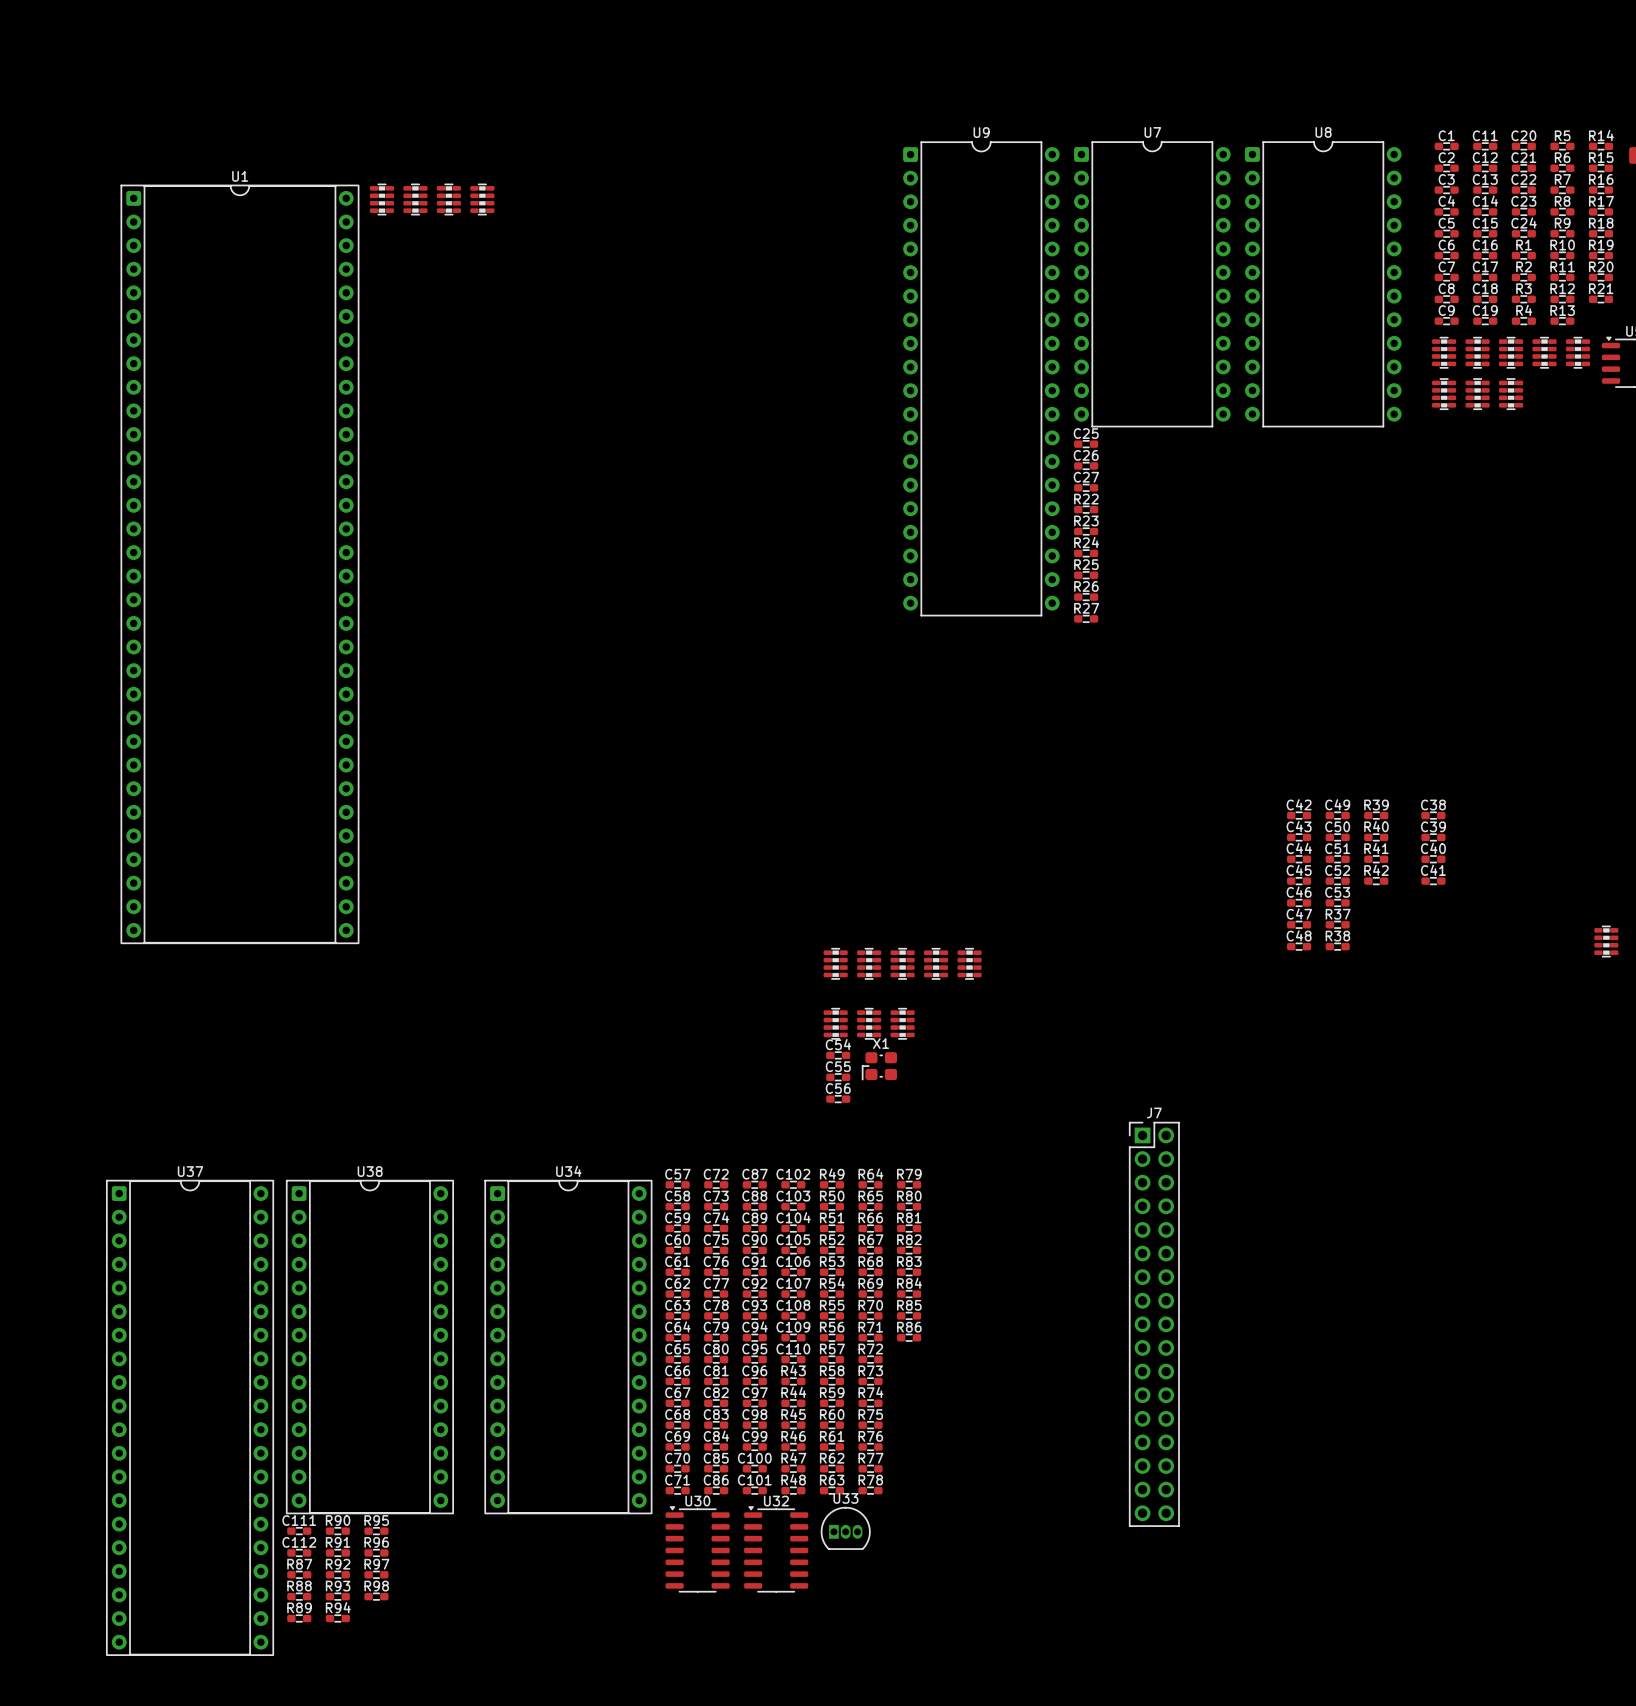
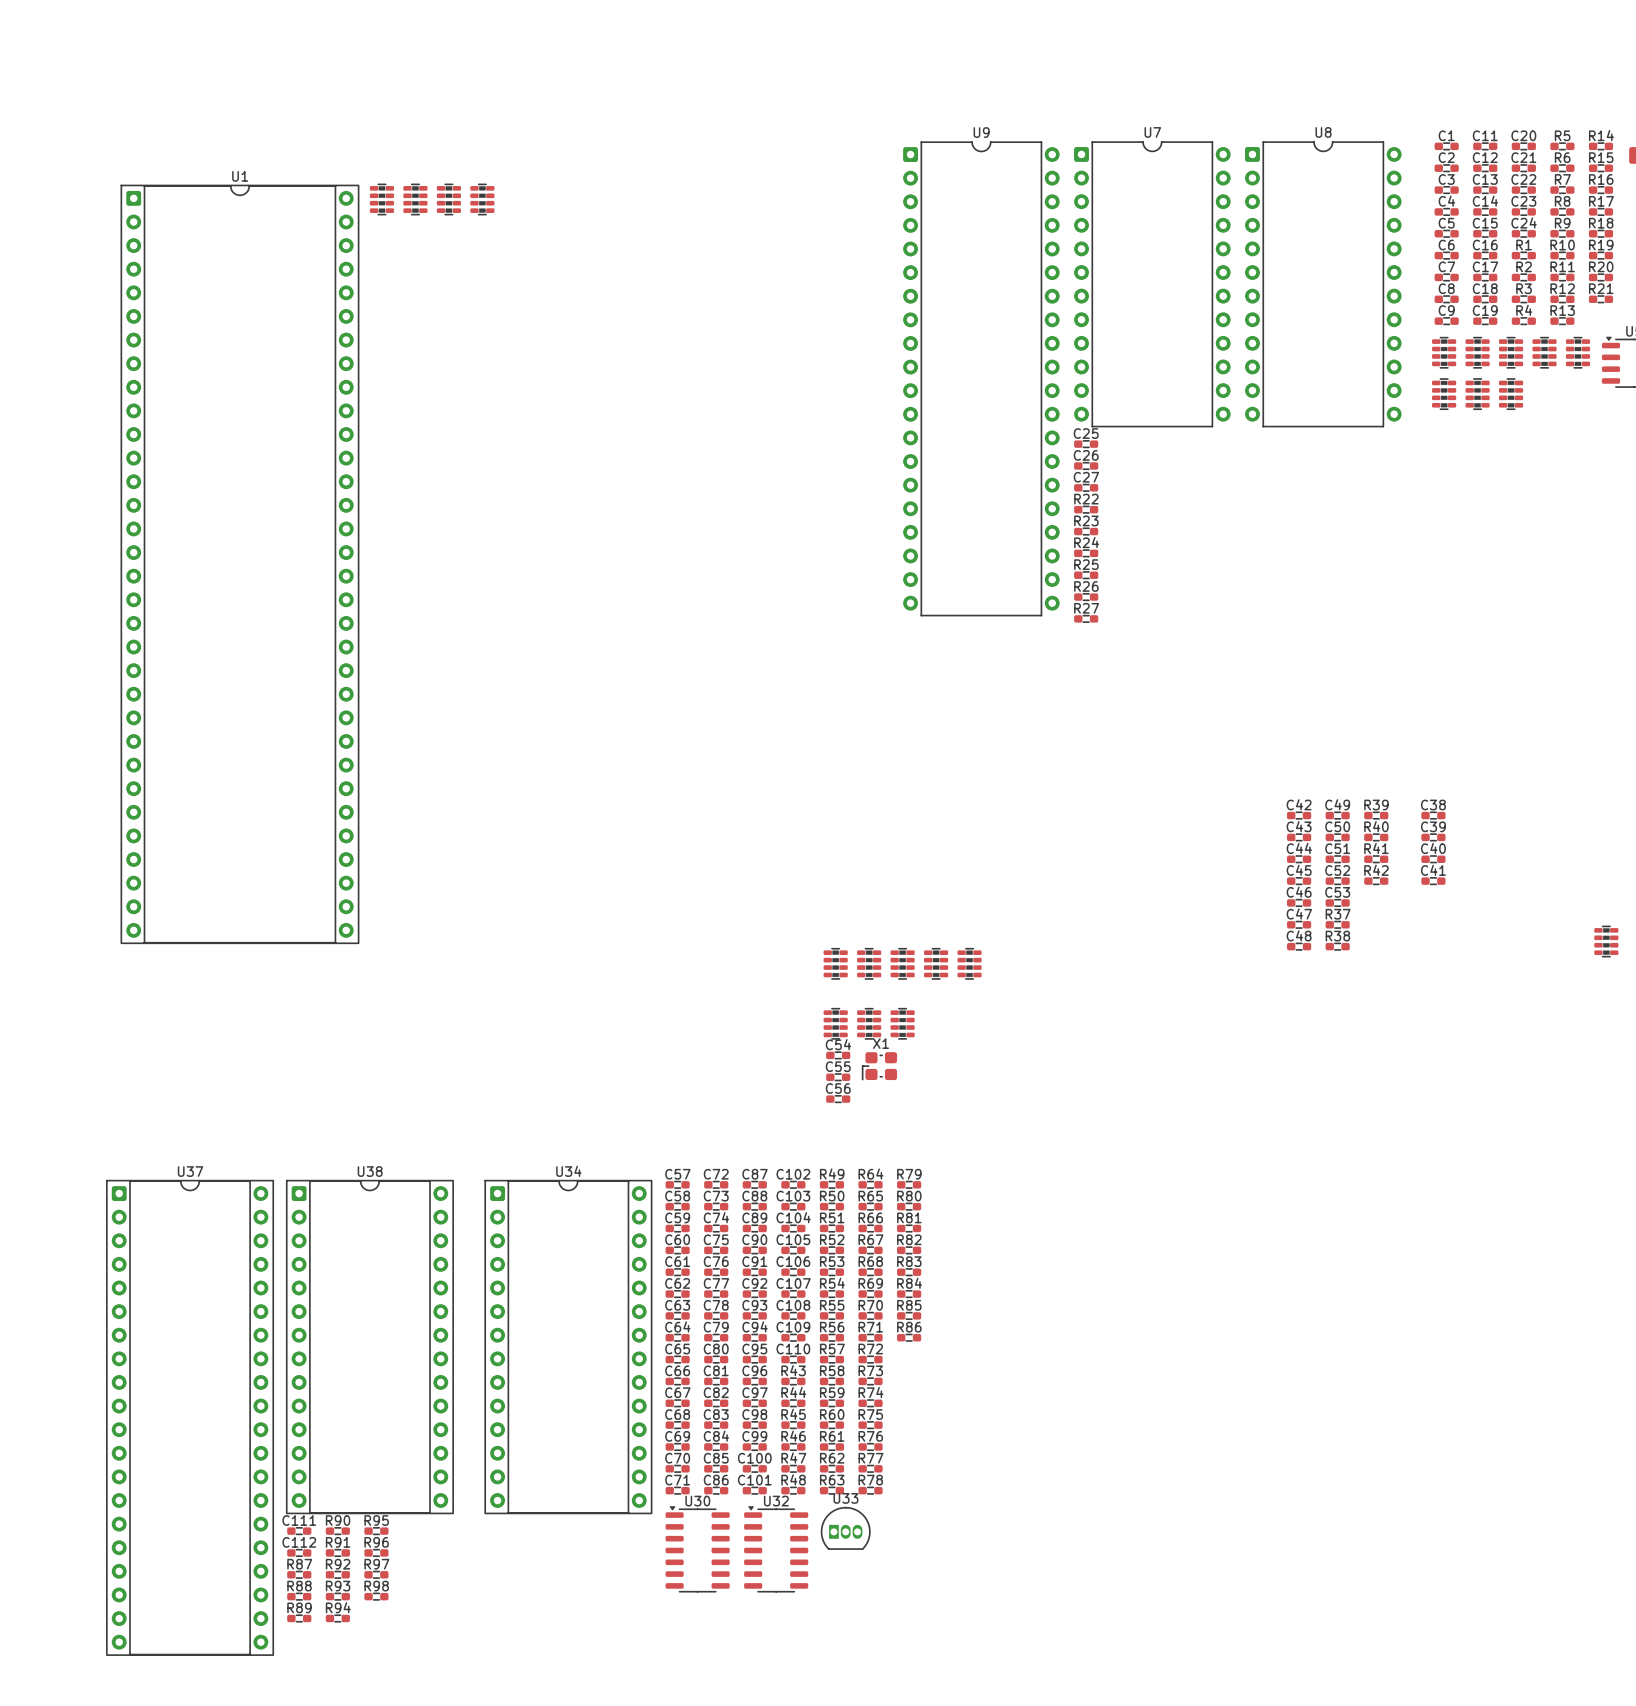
J7: (1154, 1324) -> none

